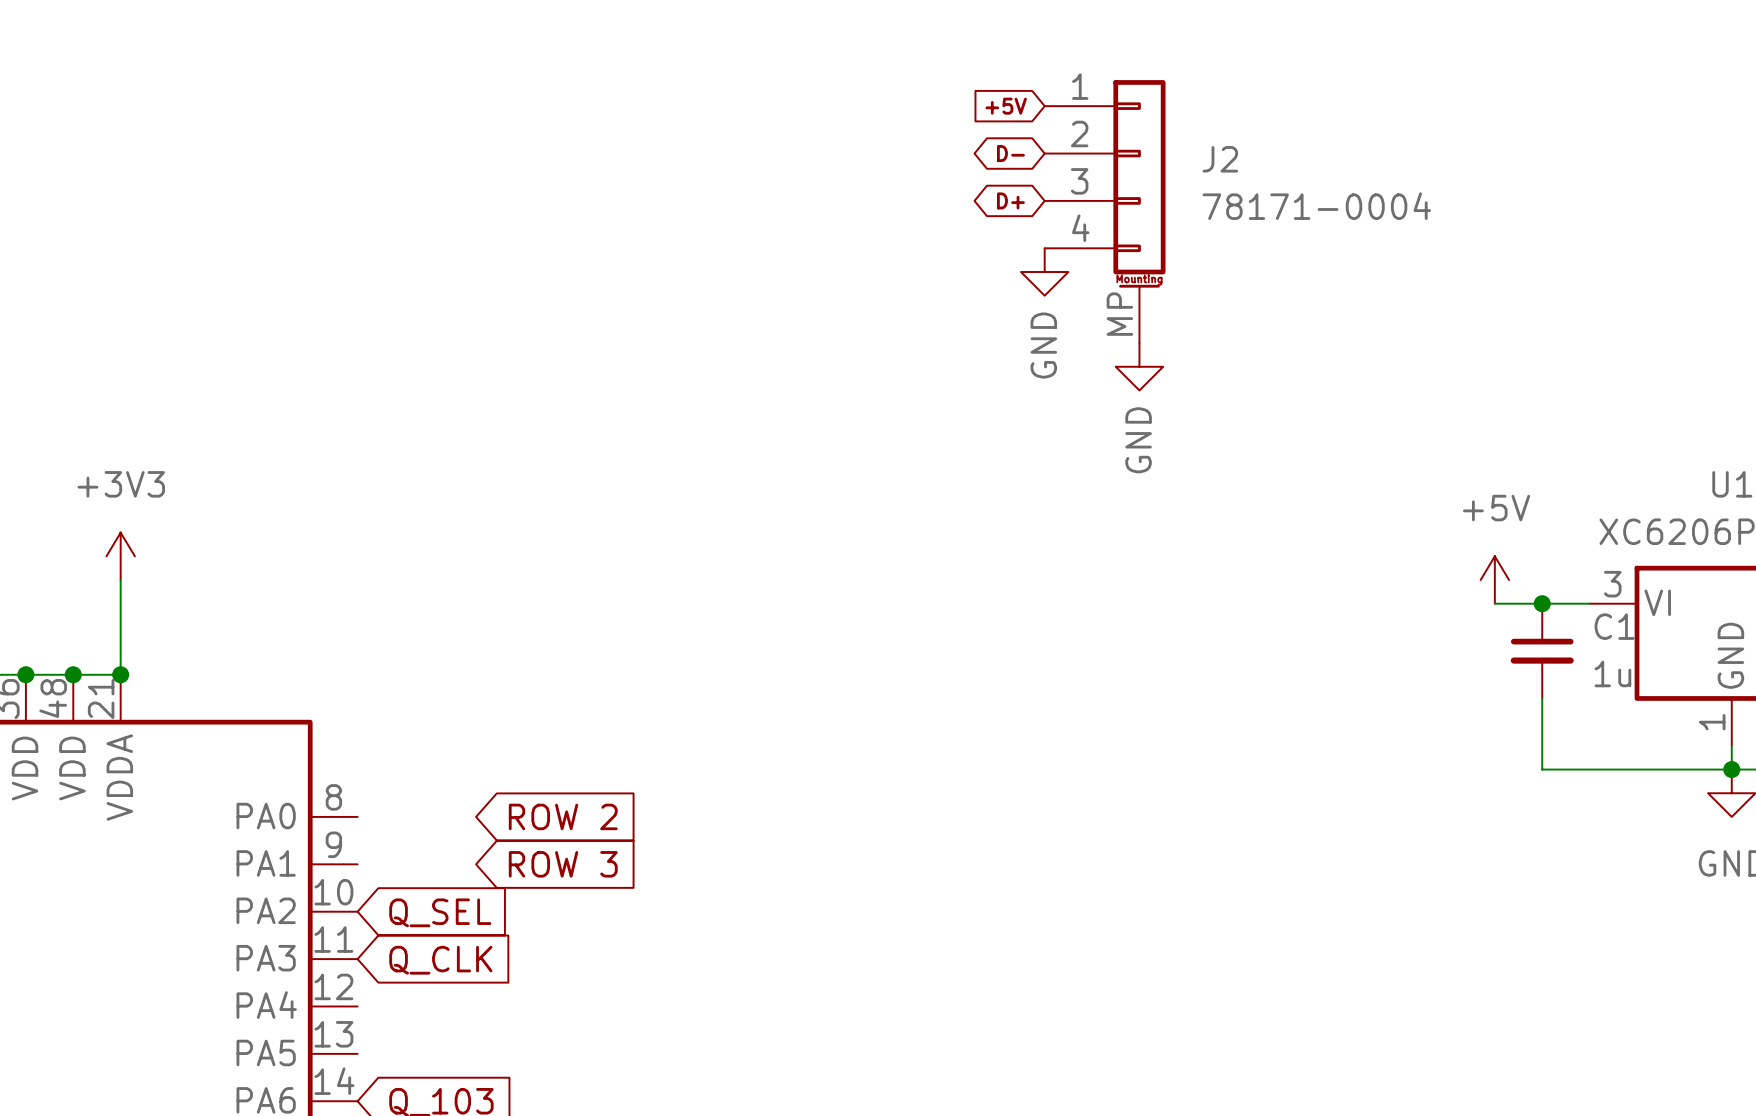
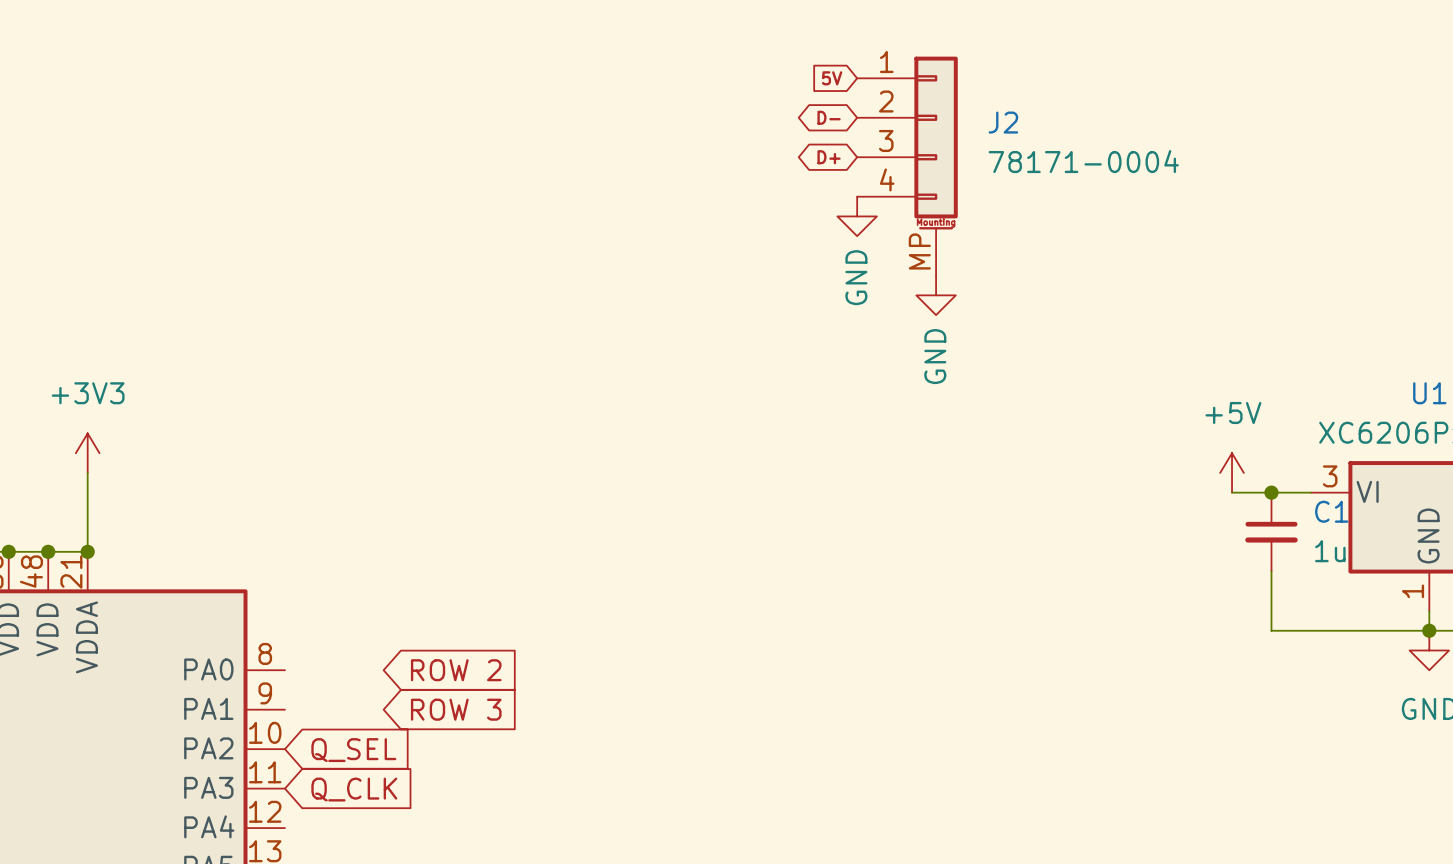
global label: +5V (1006, 106) -> 5V (832, 78)

